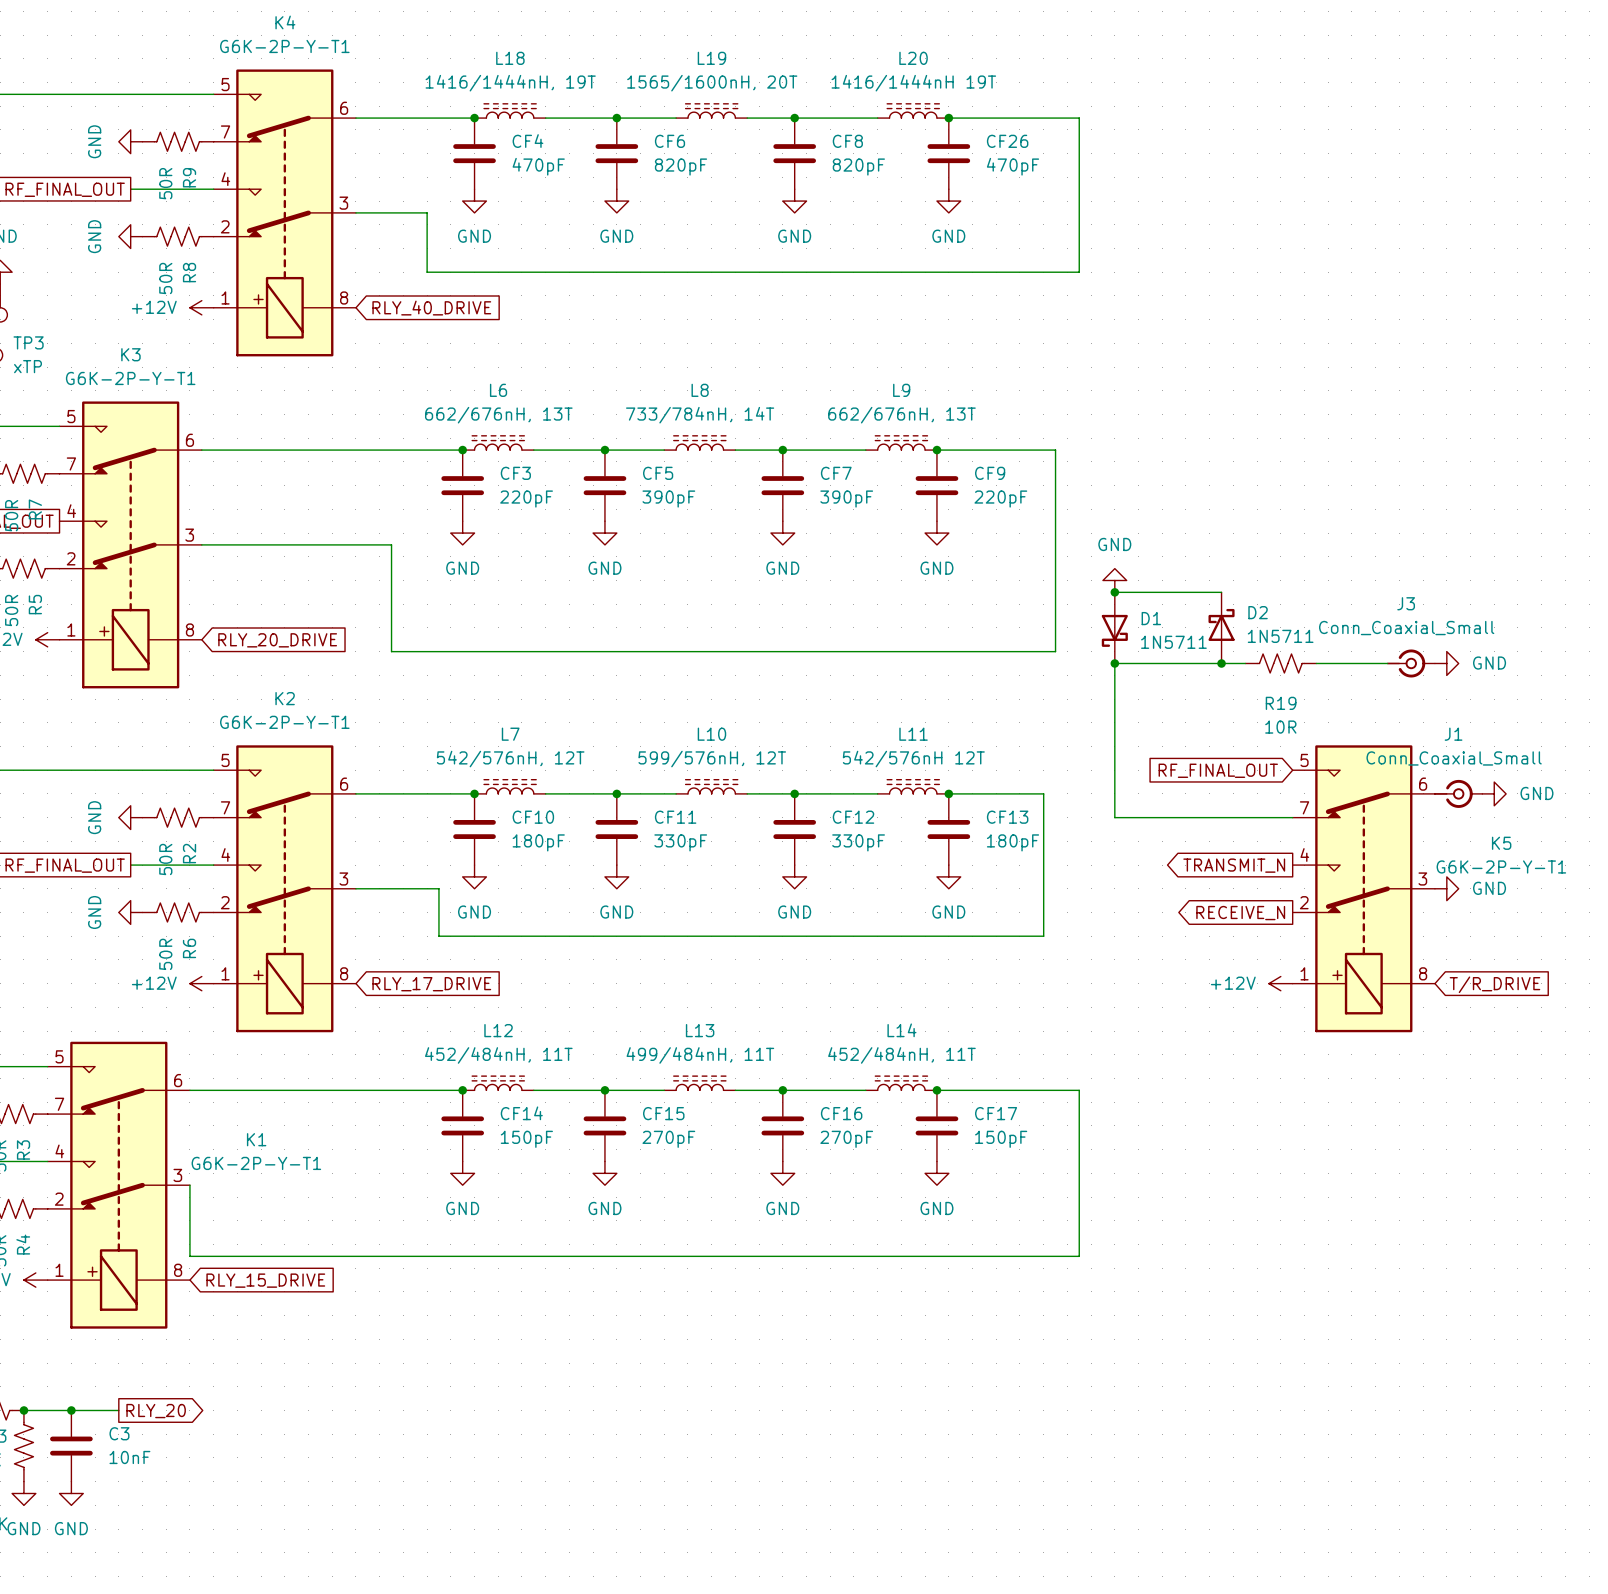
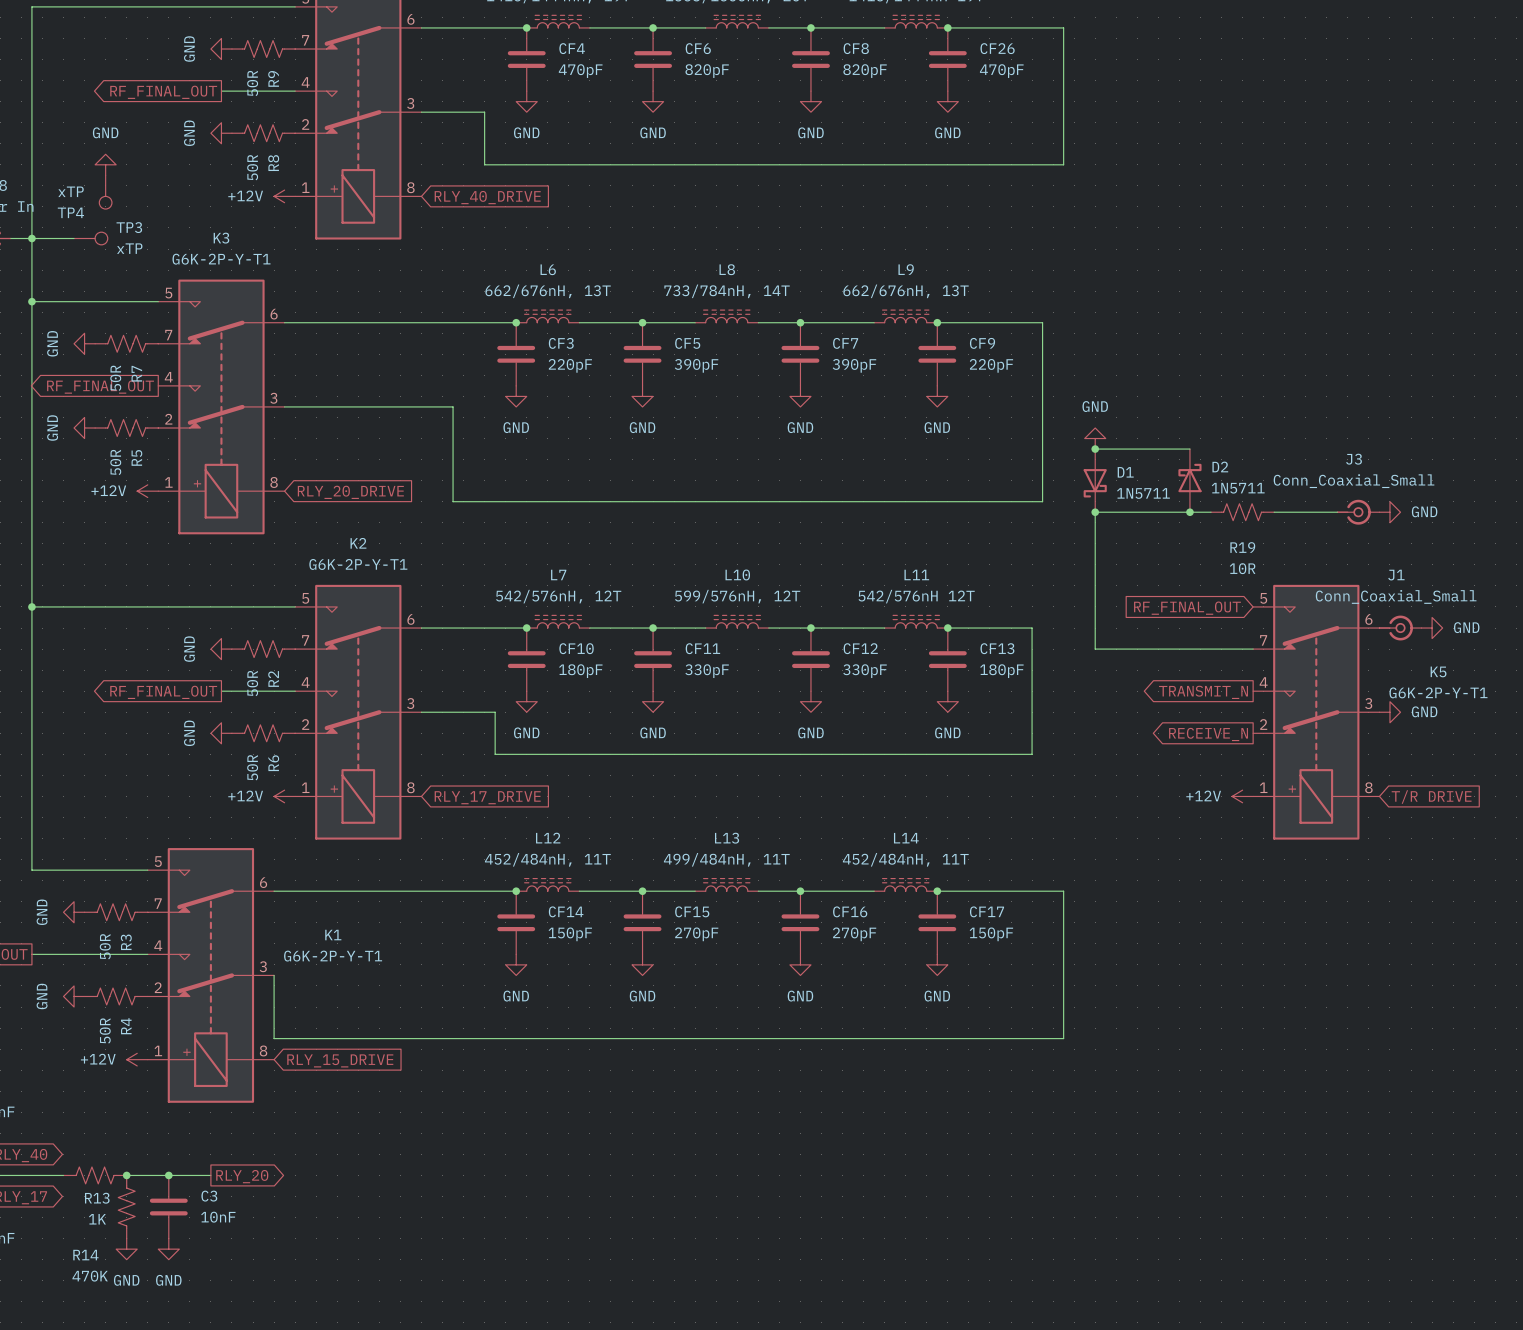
global label: T/R_DRIVE (1494, 984) -> T/R DRIVE (1431, 797)

